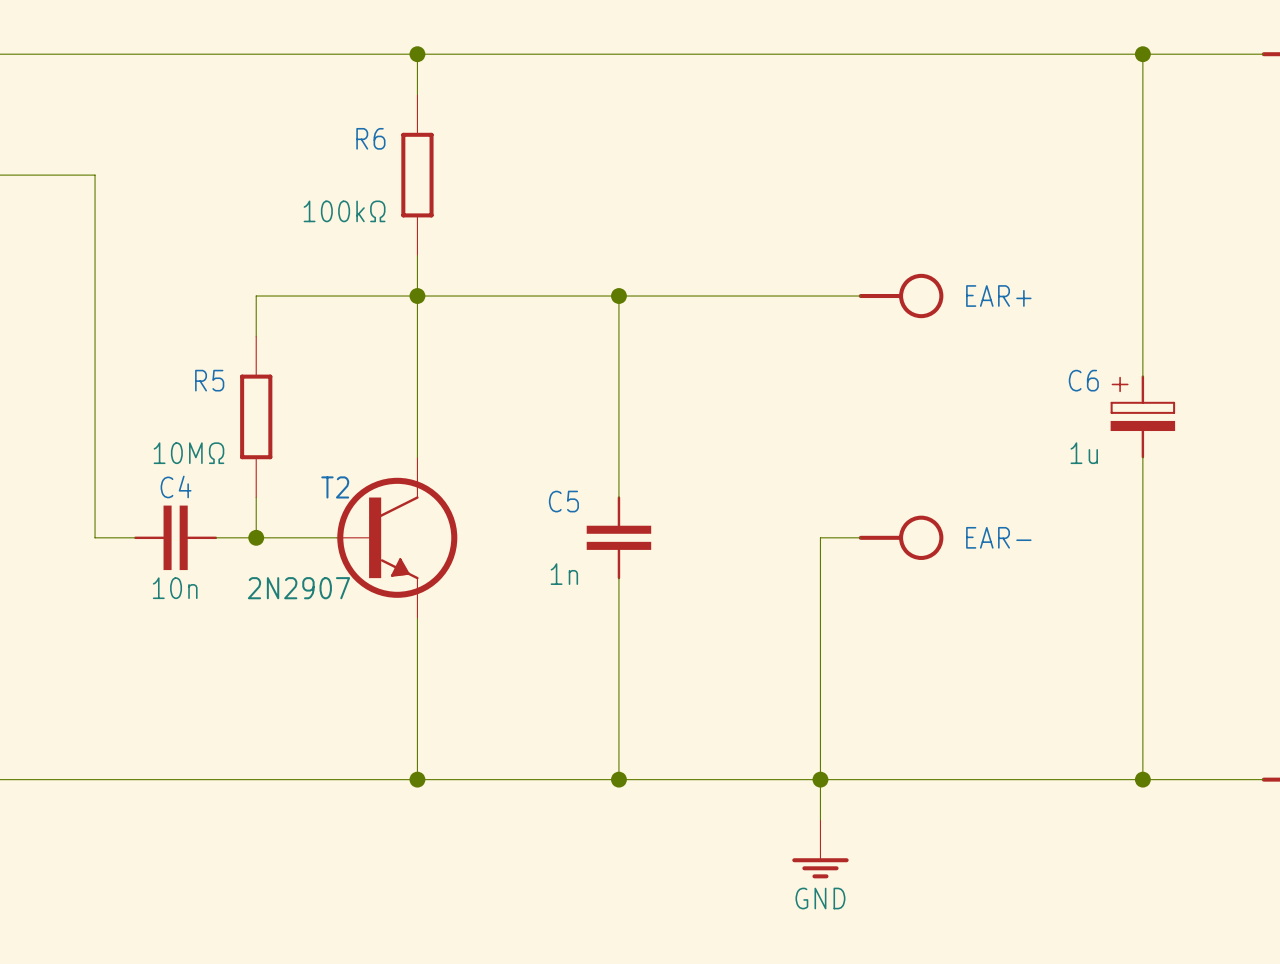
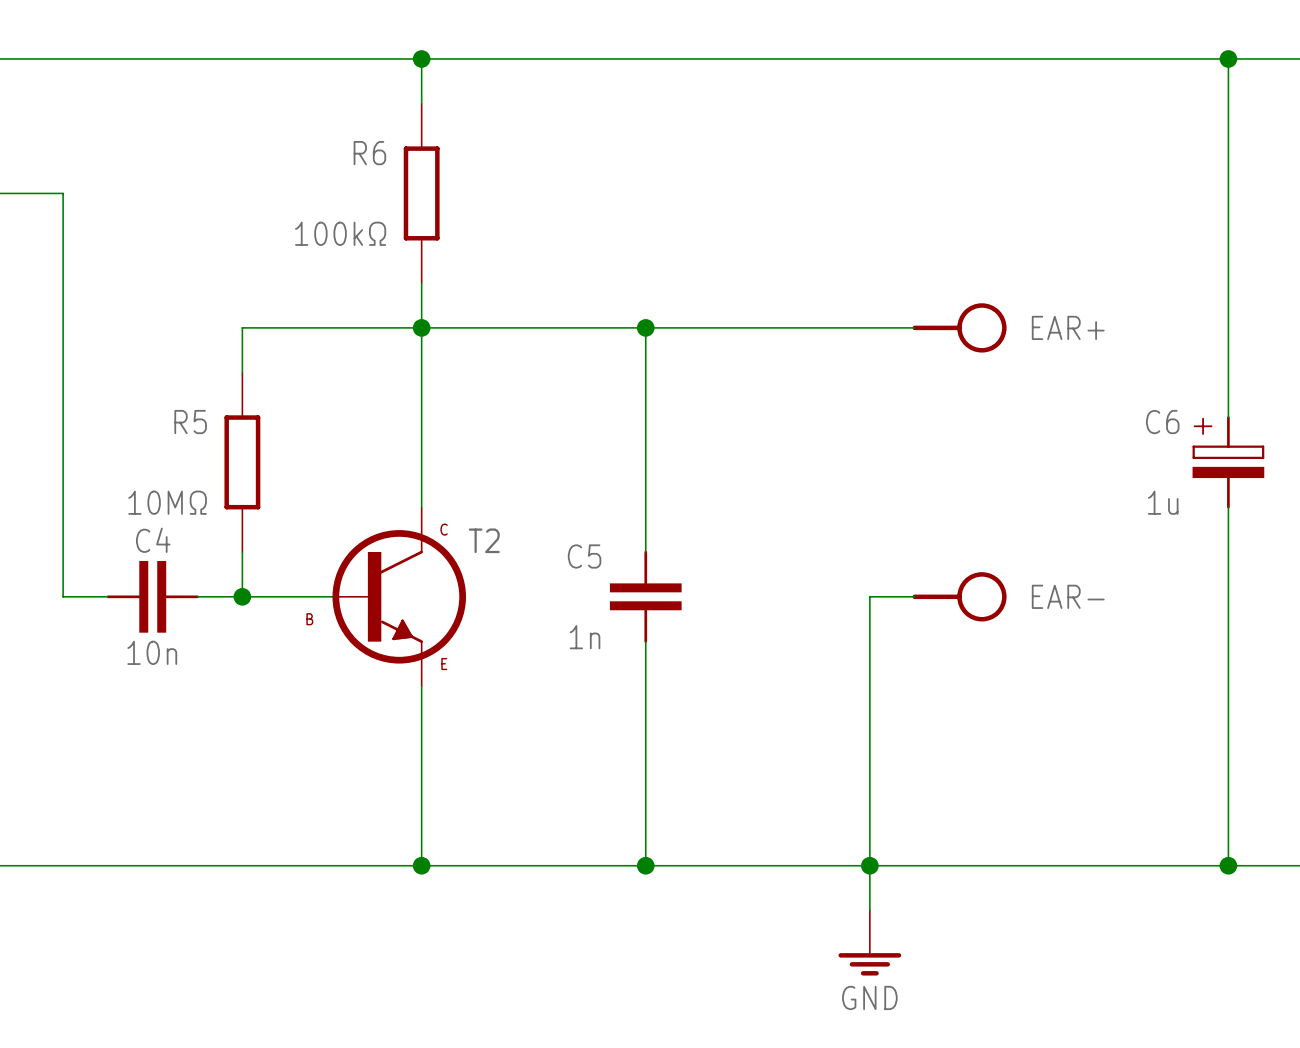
T2 text: none -> C (444, 529)
T2 name position: T2 (335, 487) -> T2 (484, 540)
T2 text: none -> B (309, 619)
T2 value: 2N2907 (298, 588) -> none
T2 text: none -> E (444, 664)

